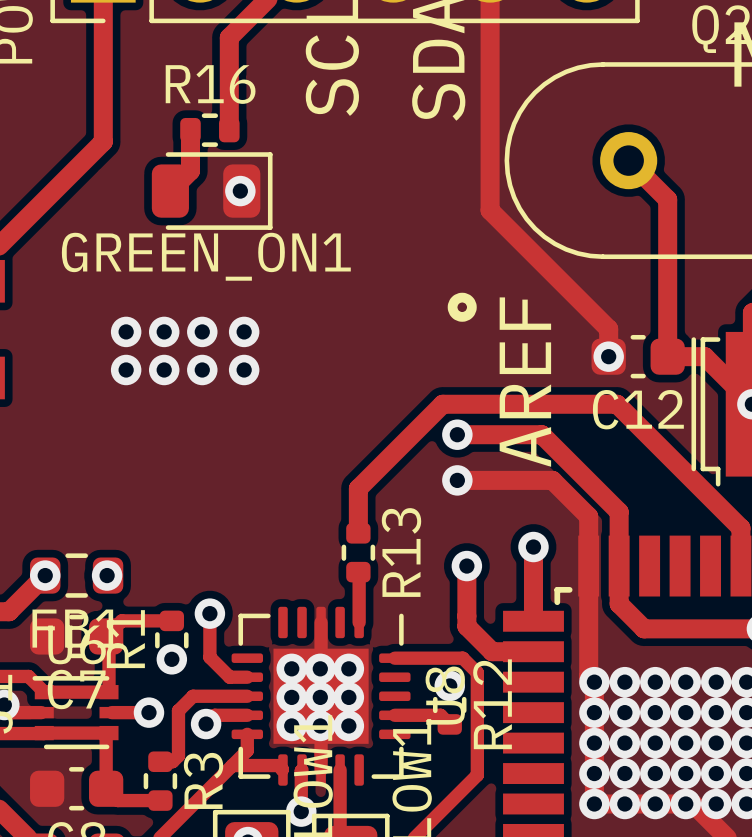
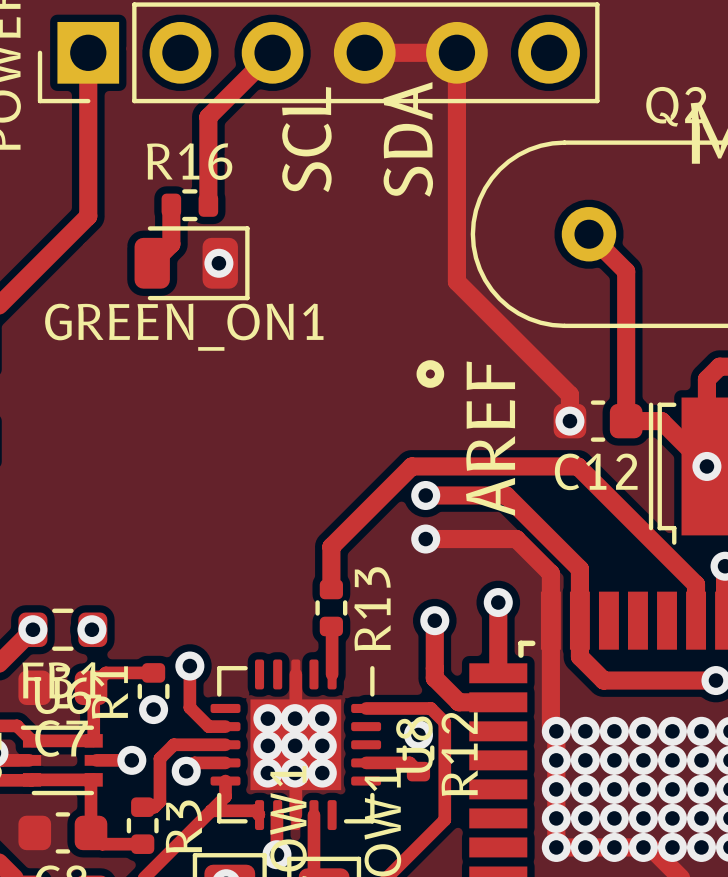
via: (126, 331) -> none
via: (164, 331) -> none
via: (202, 331) -> none
via: (244, 331) -> none
via: (126, 369) -> none
via: (164, 369) -> none
via: (202, 369) -> none
via: (244, 369) -> none

